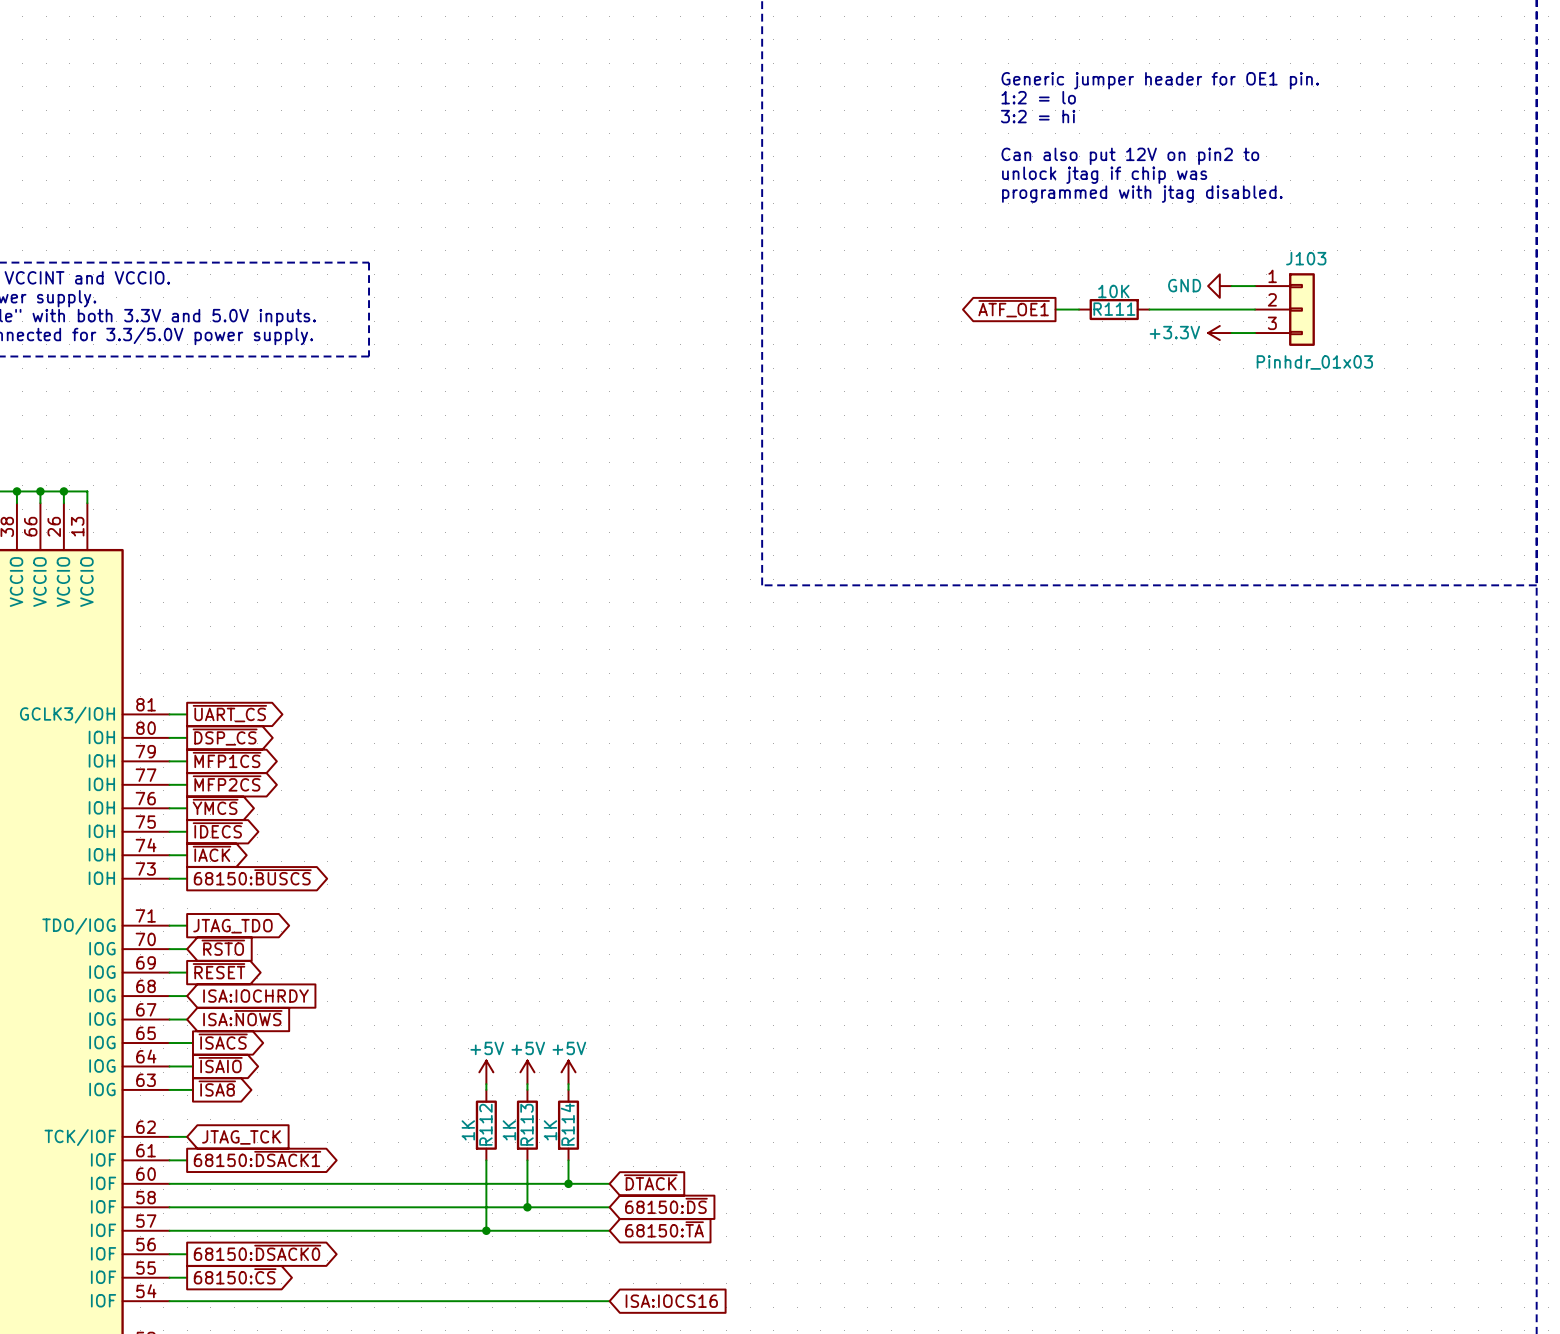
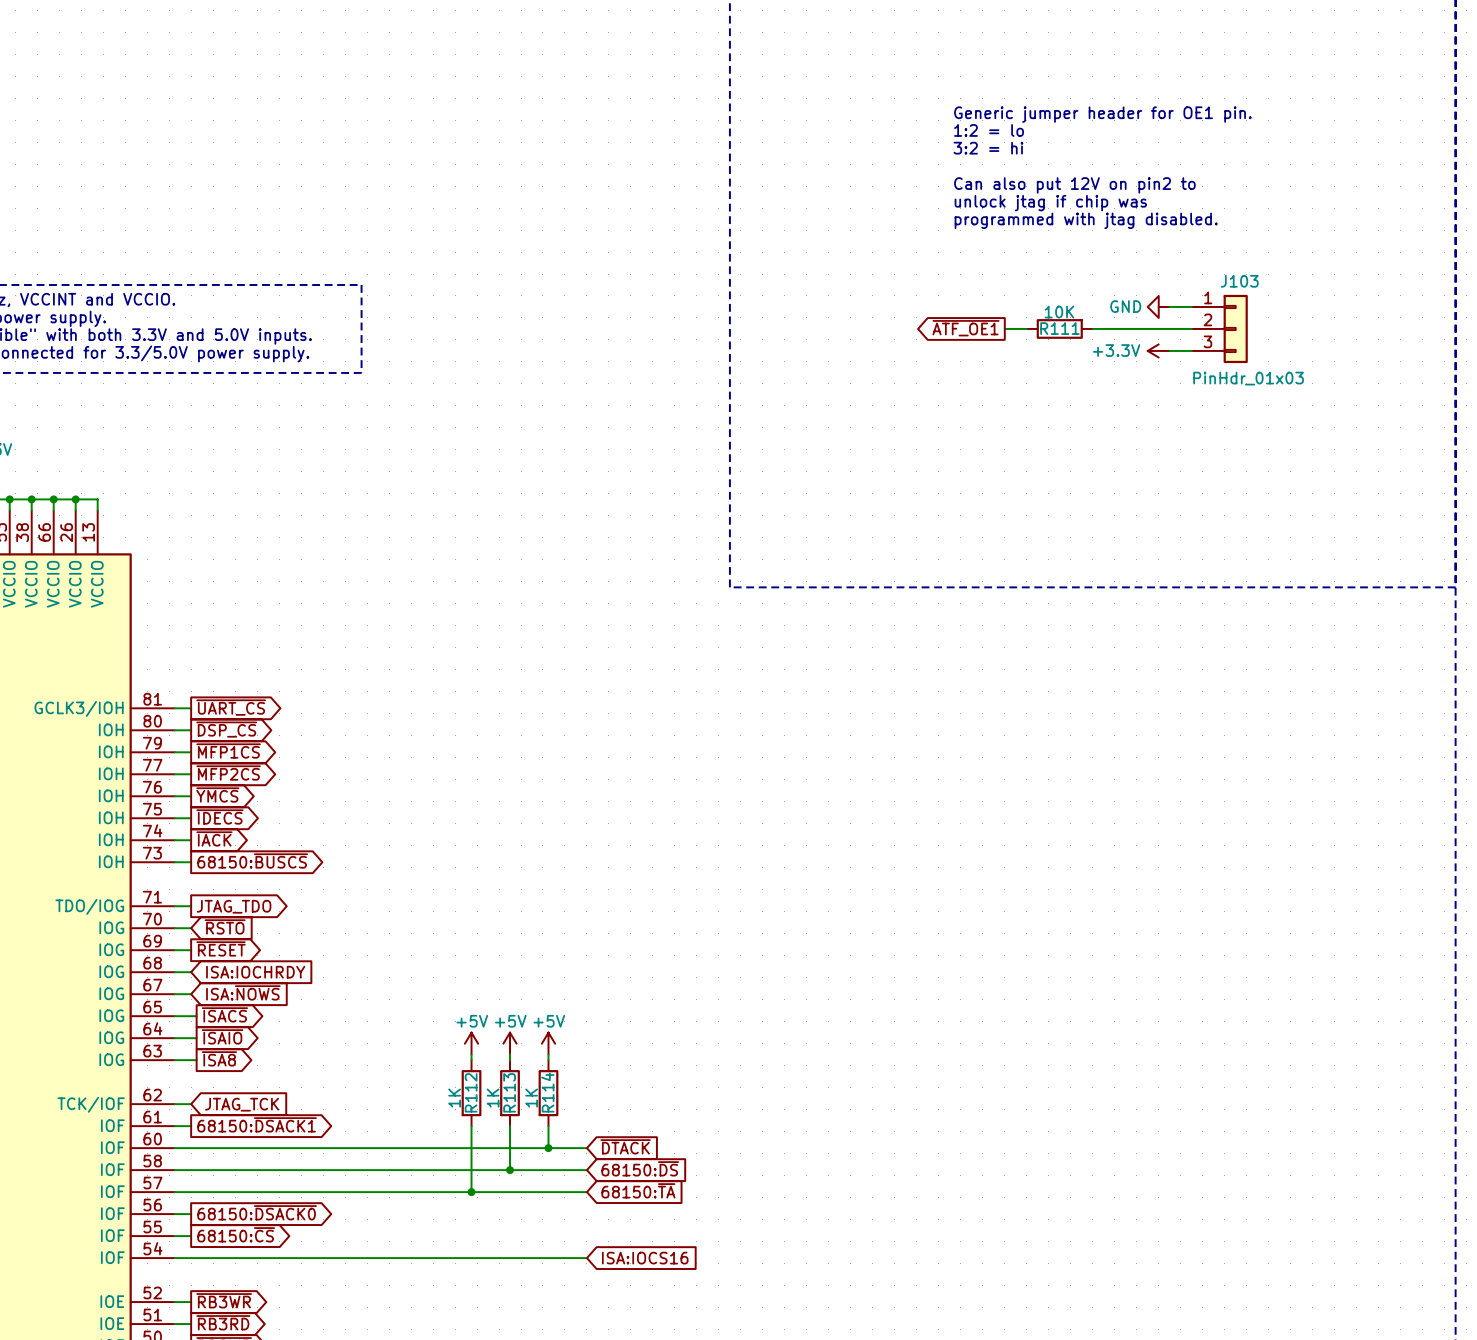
J103 value: Pinhdr_01x03 (1314, 362) -> PinHdr_01x03 (1248, 378)

